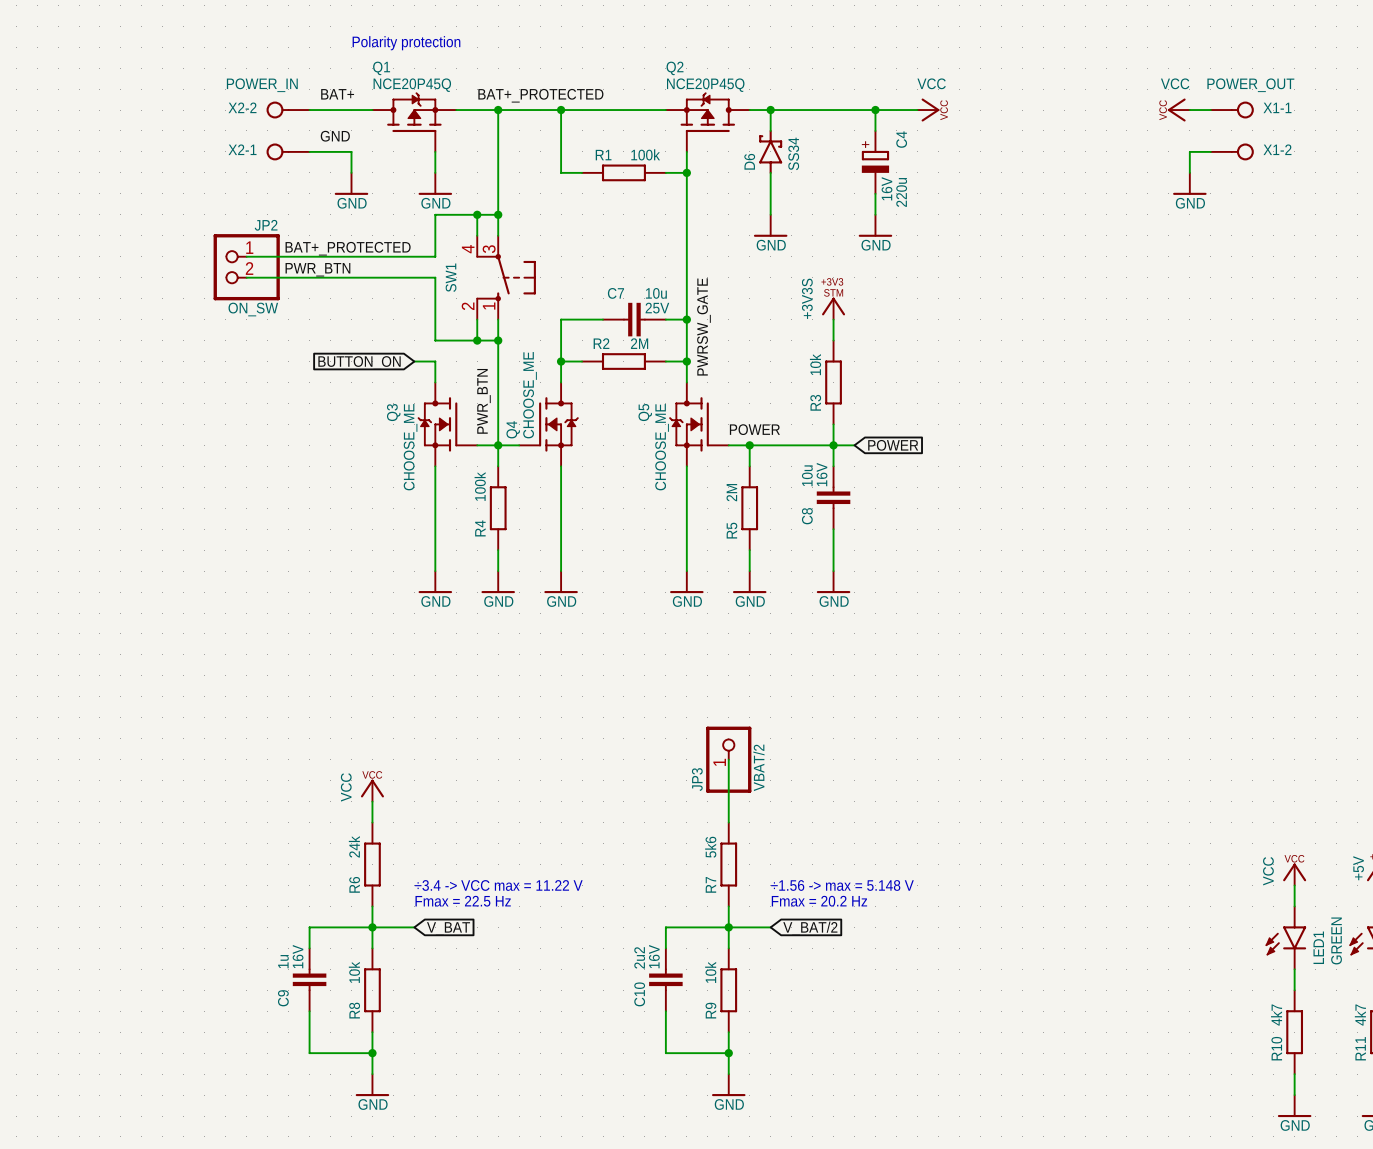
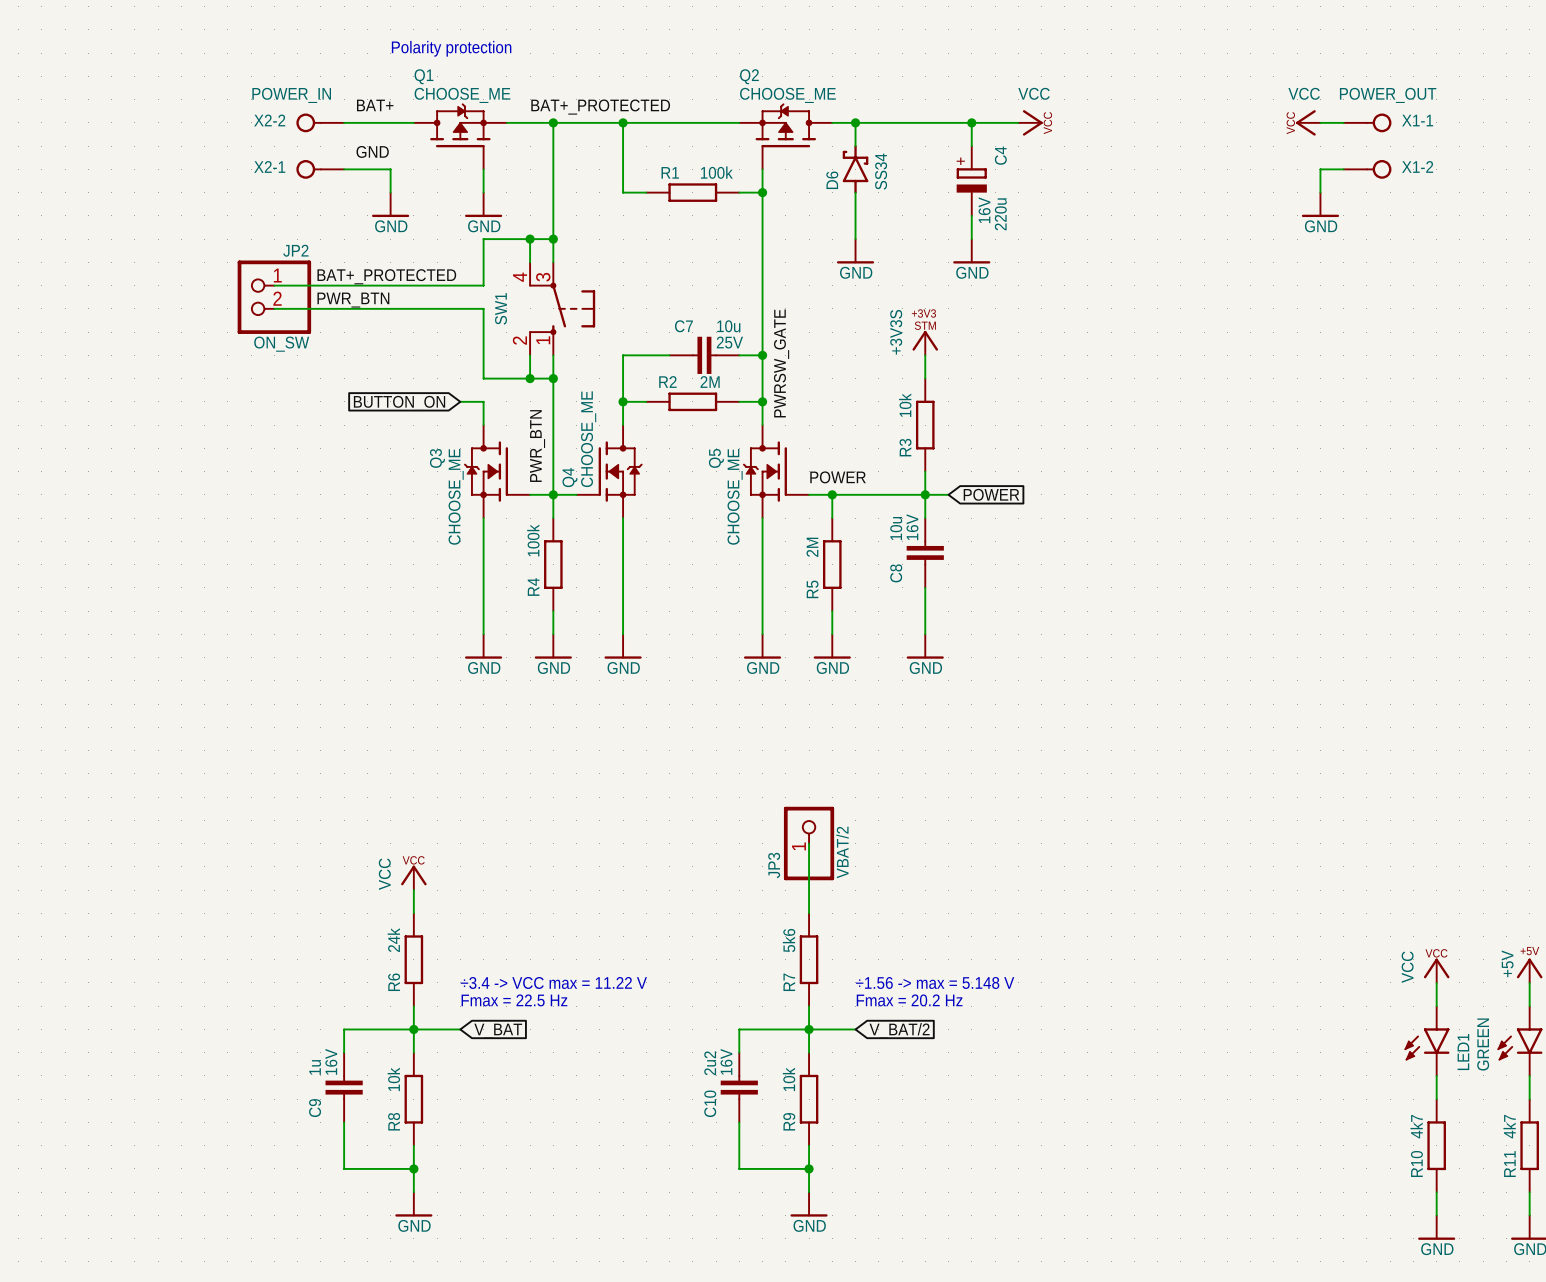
Q1 value: NCE20P45Q (412, 85) -> CHOOSE_ME (462, 95)
Q2 value: NCE20P45Q (705, 85) -> CHOOSE_ME (787, 95)

